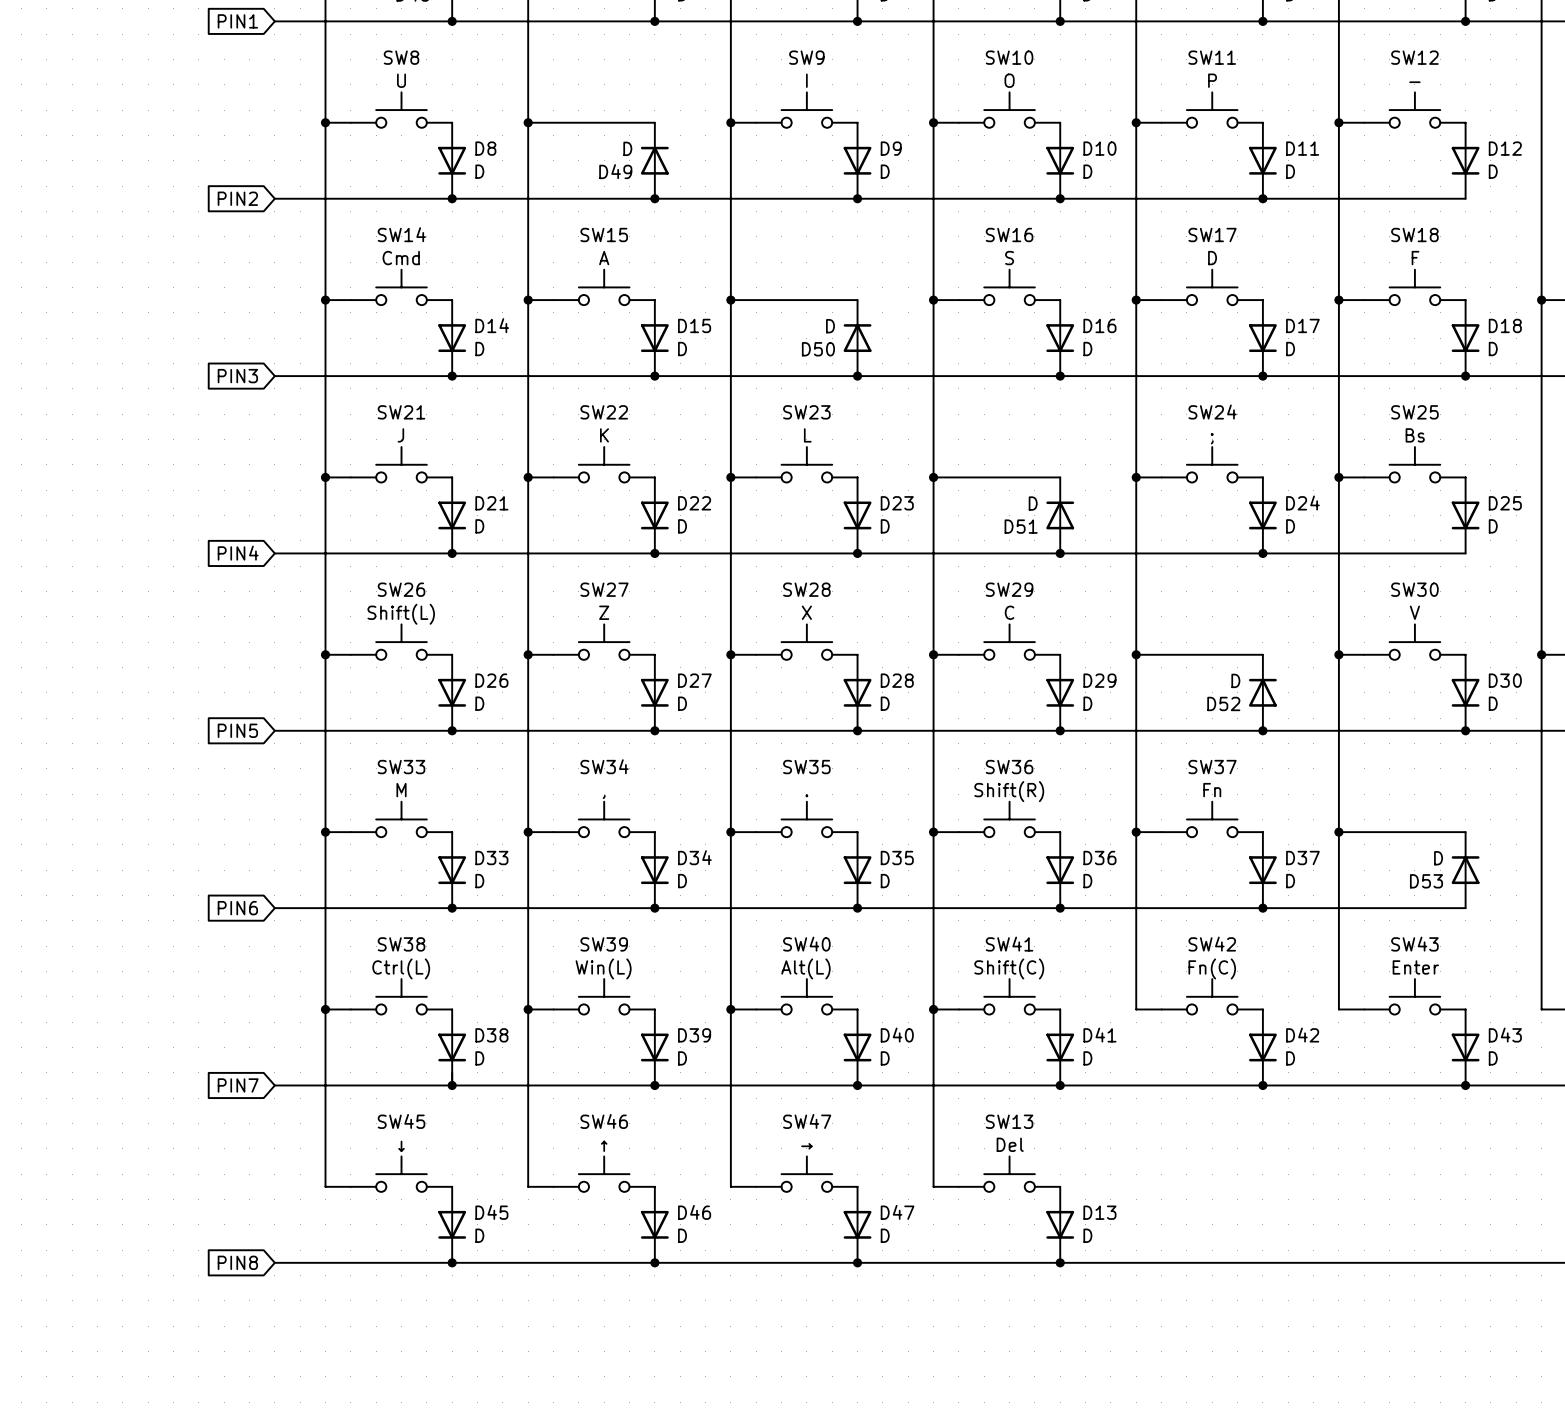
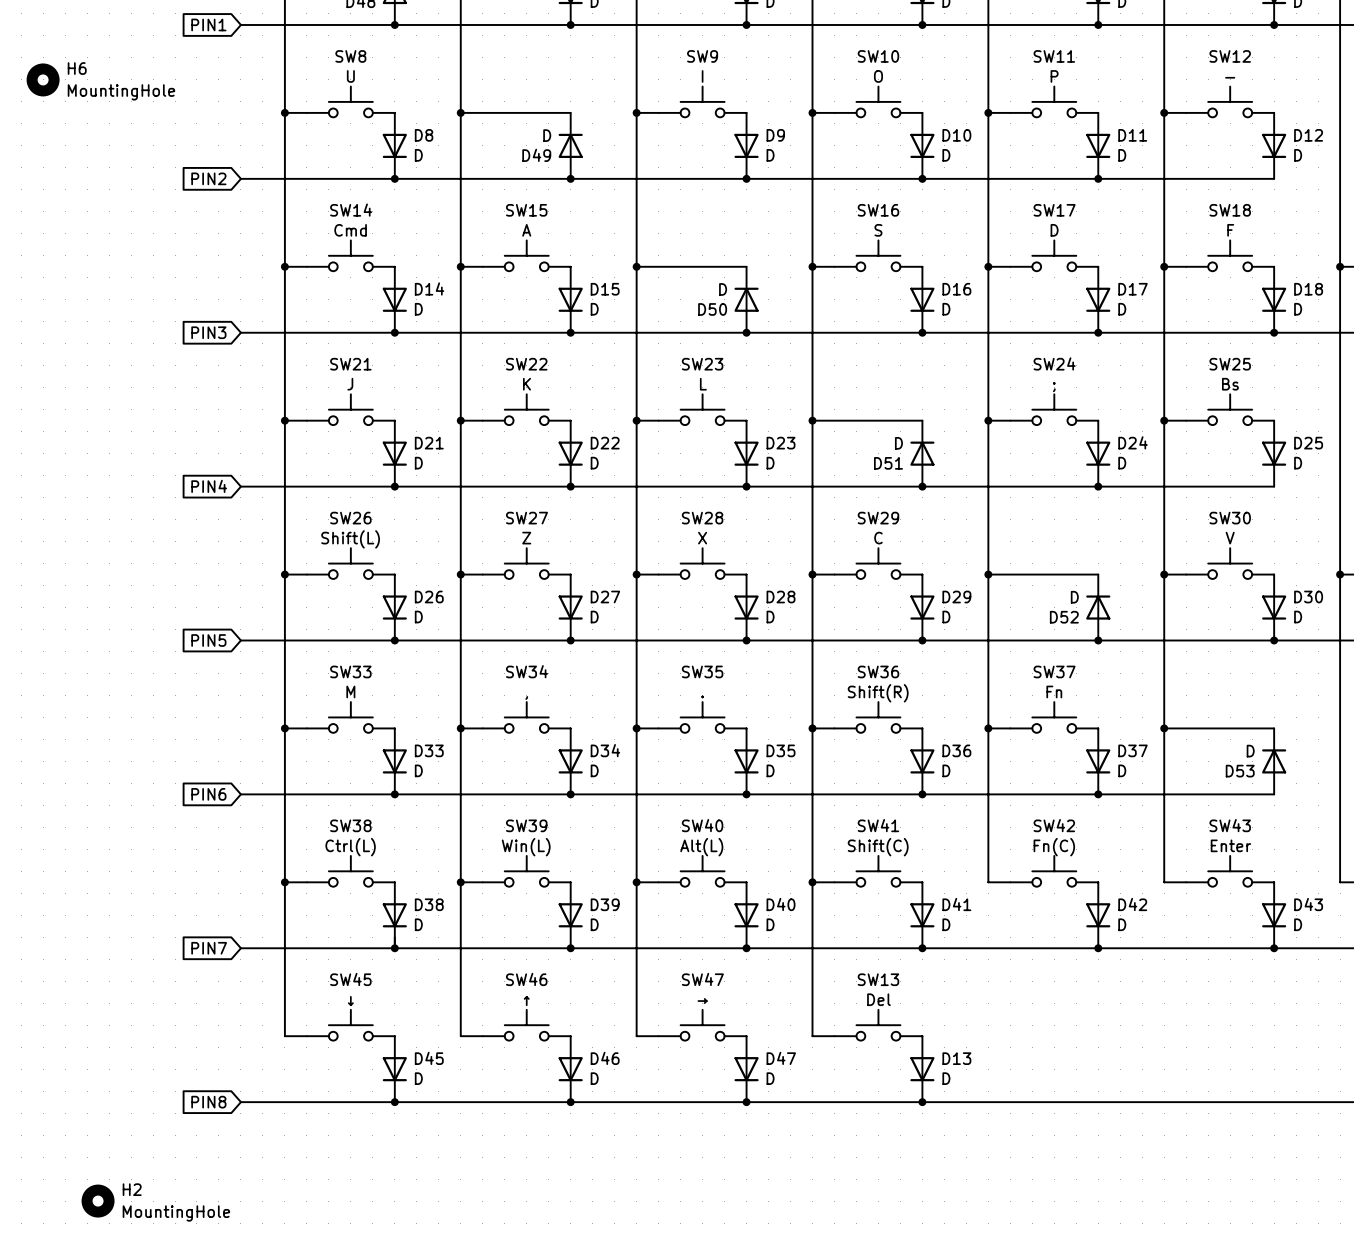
H6: none -> MountingHole (43, 79)
H2: none -> MountingHole (98, 1201)

